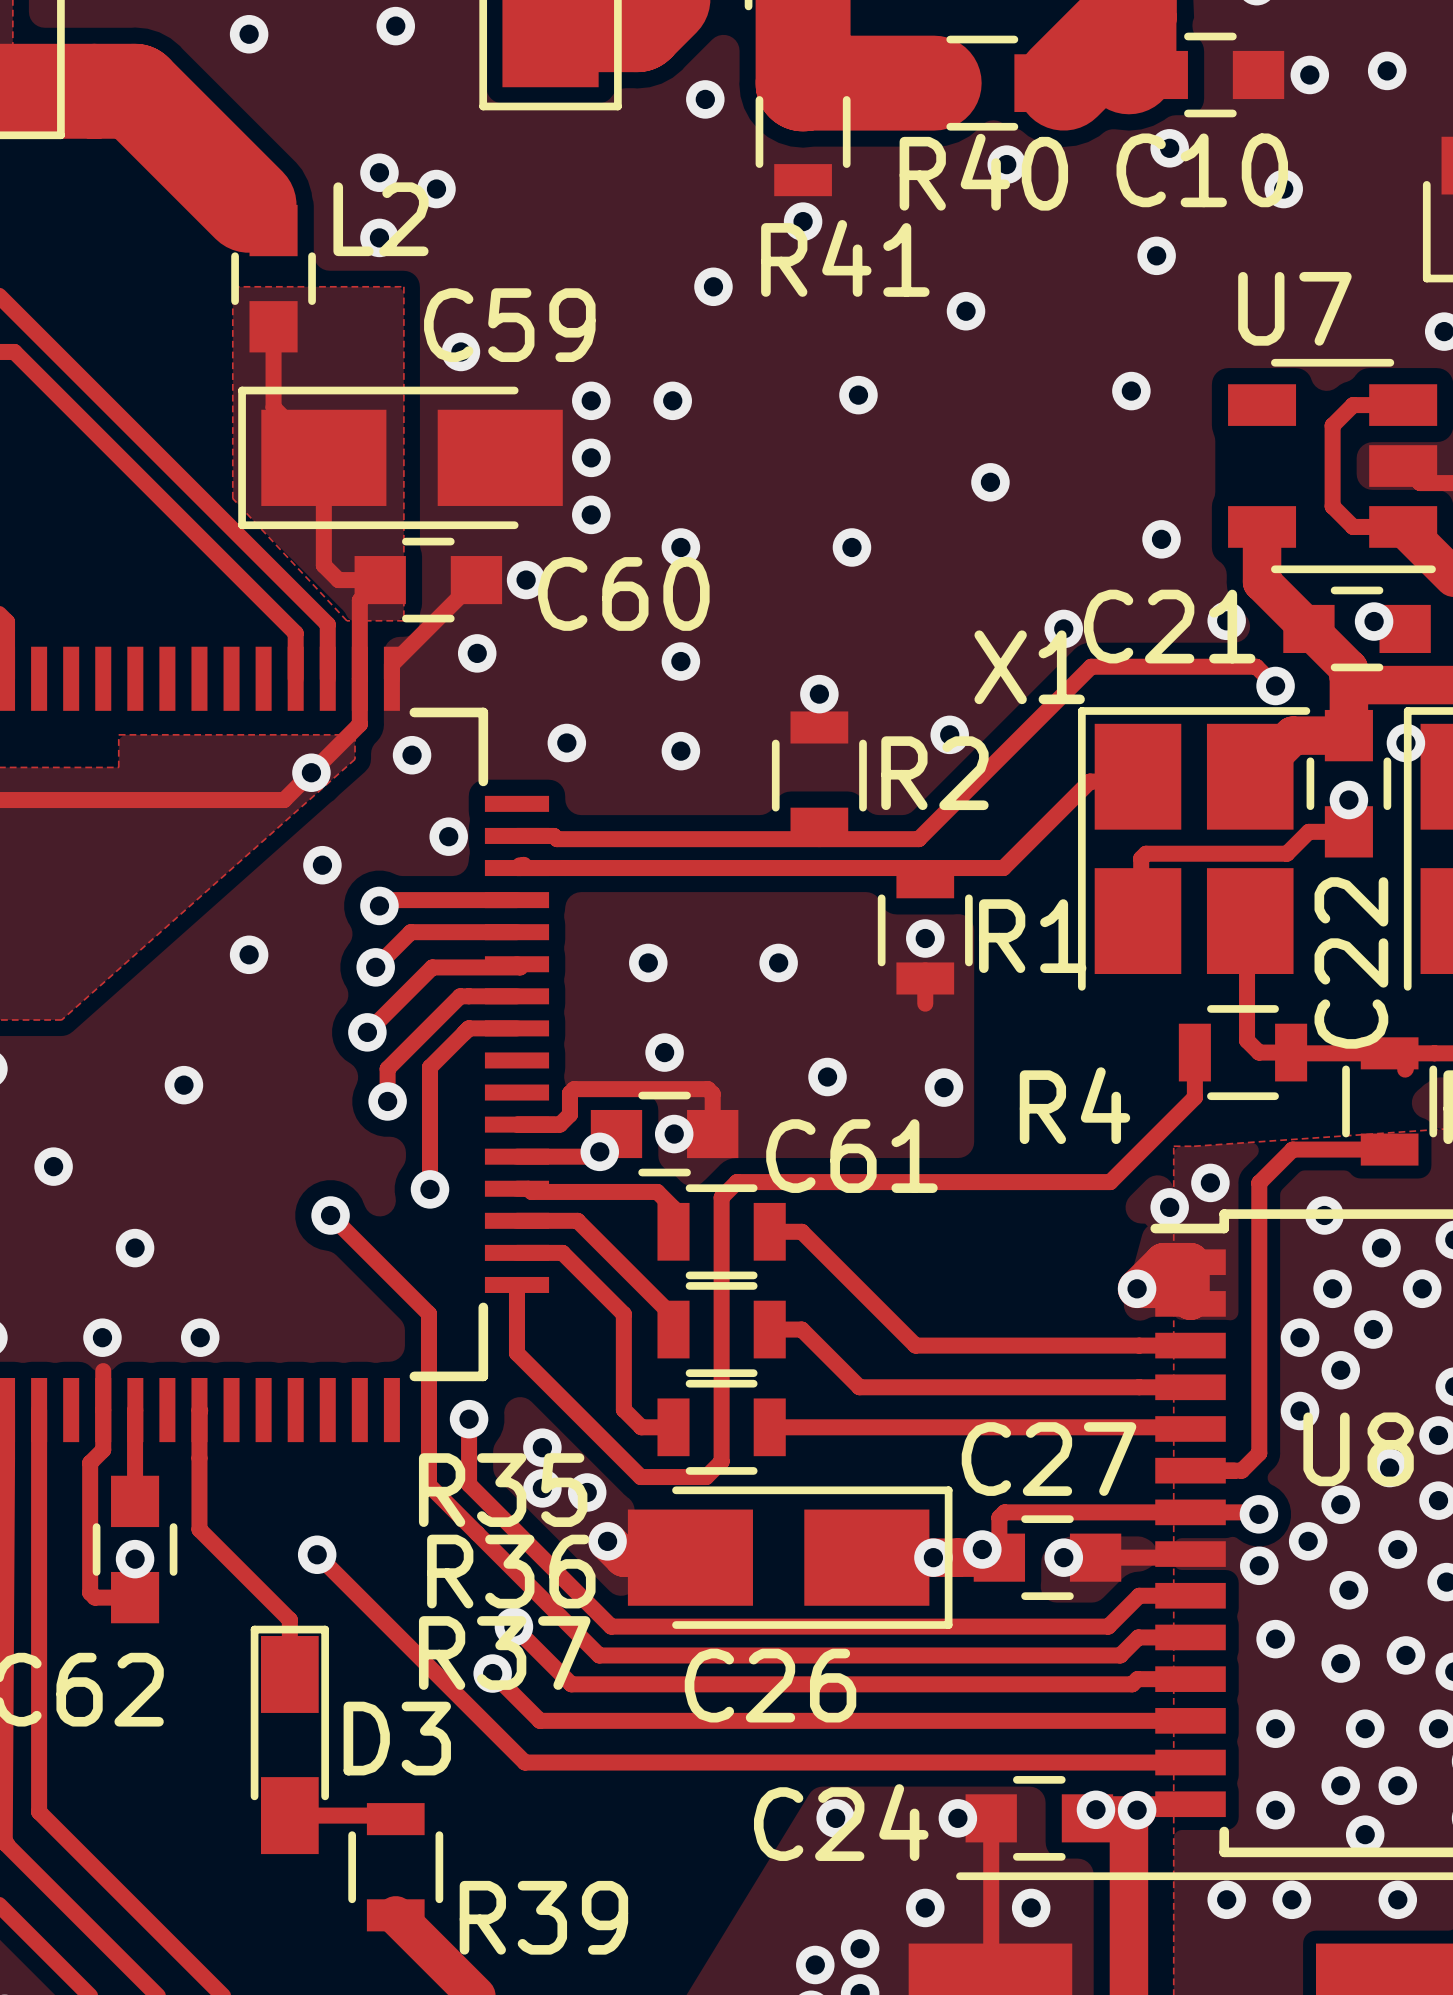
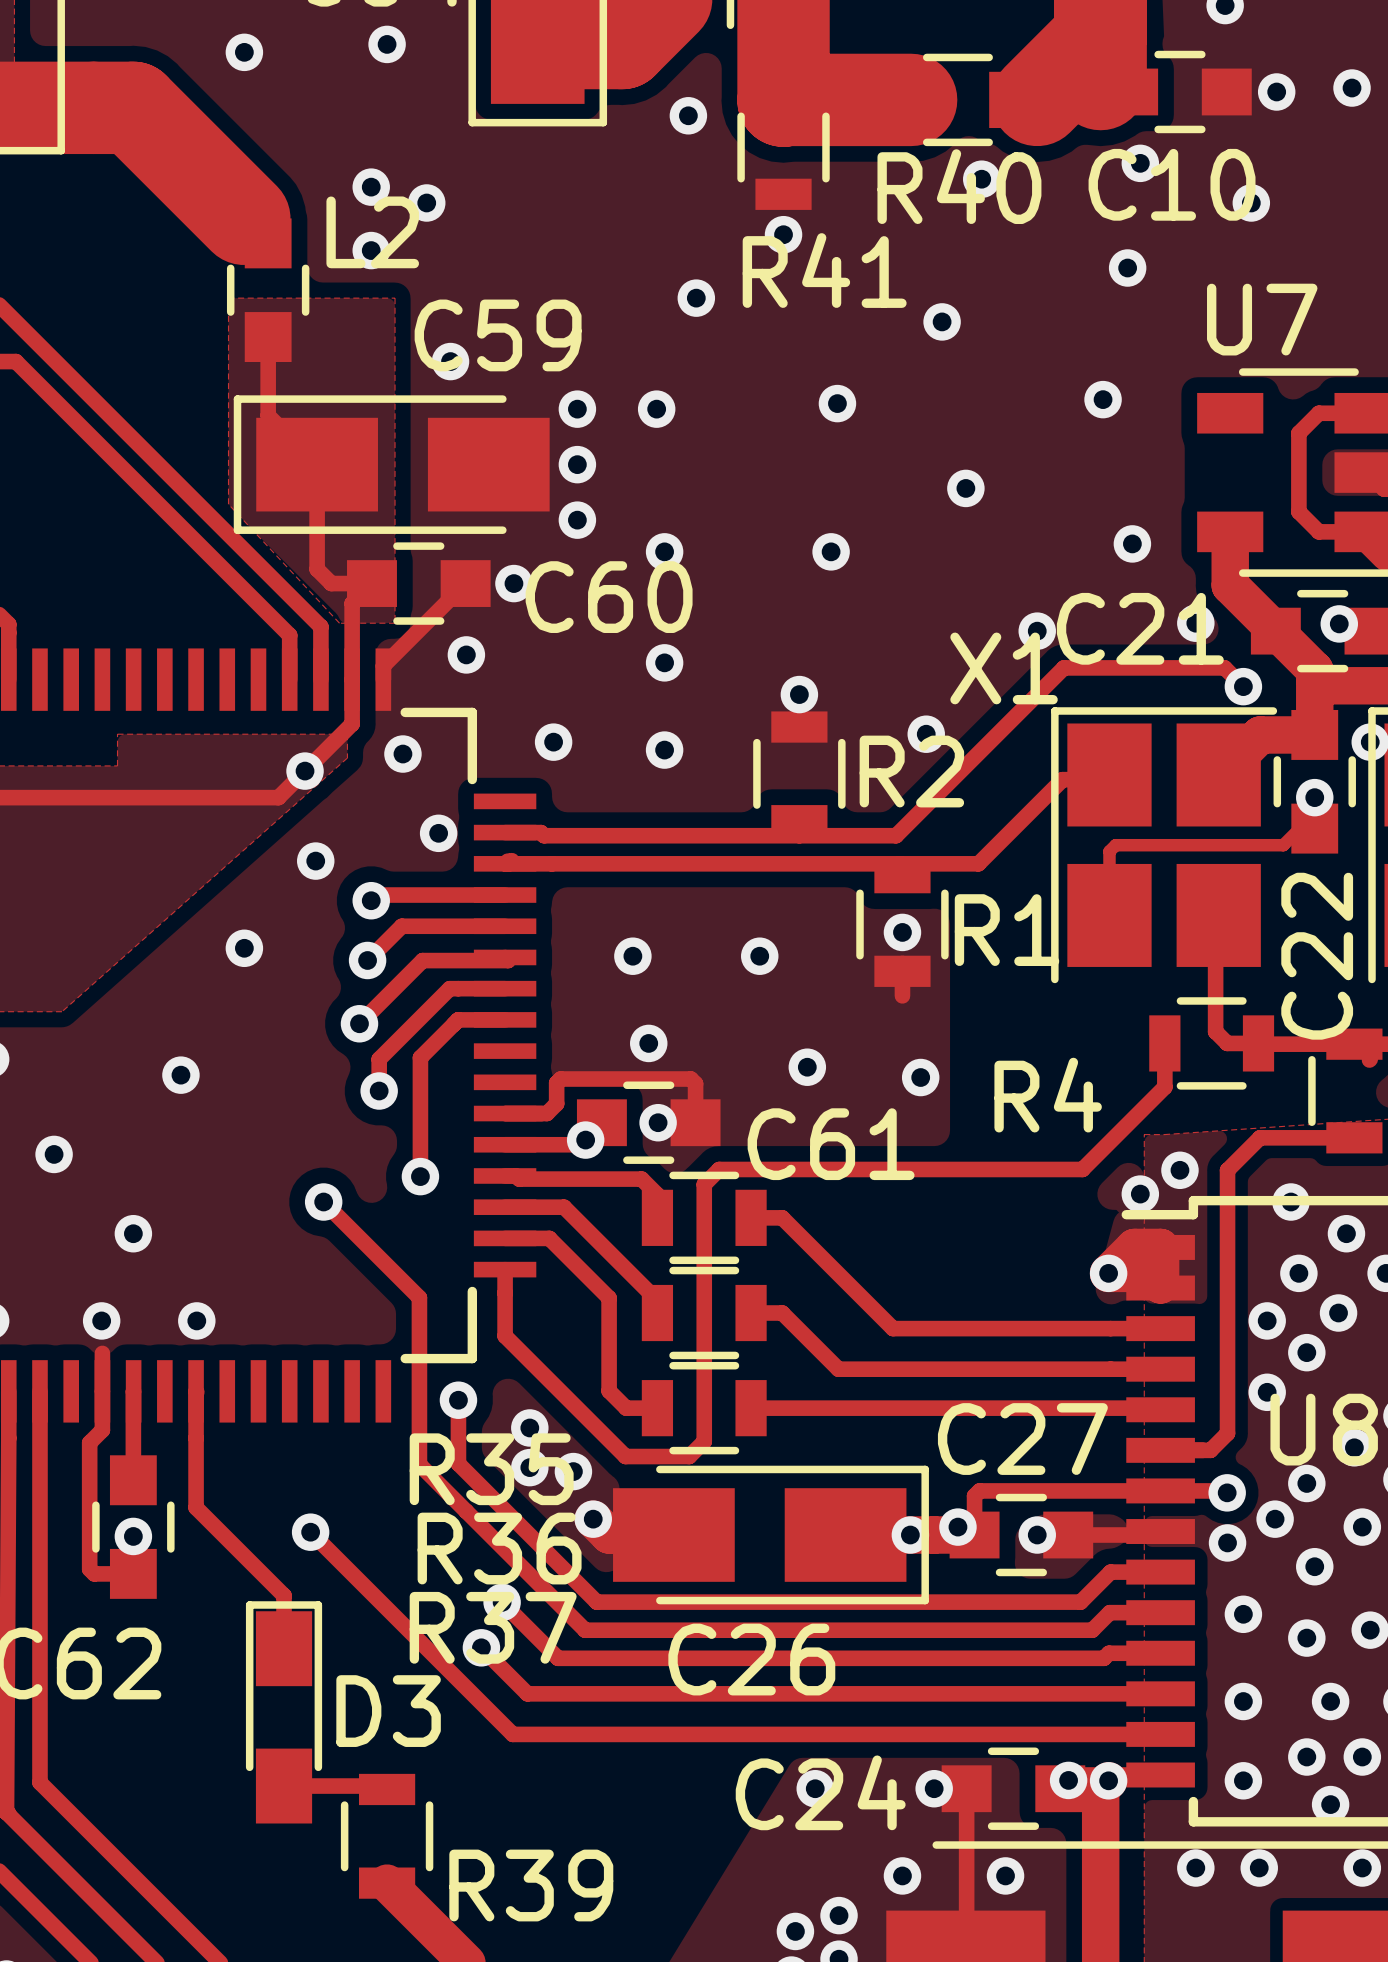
track: (1333, 831) (1308, 831) (1286, 853) (1146, 853) (1141, 858) (1141, 916) -> (1299, 828) (1283, 845) (1115, 845) (1109, 851) (1109, 915)

